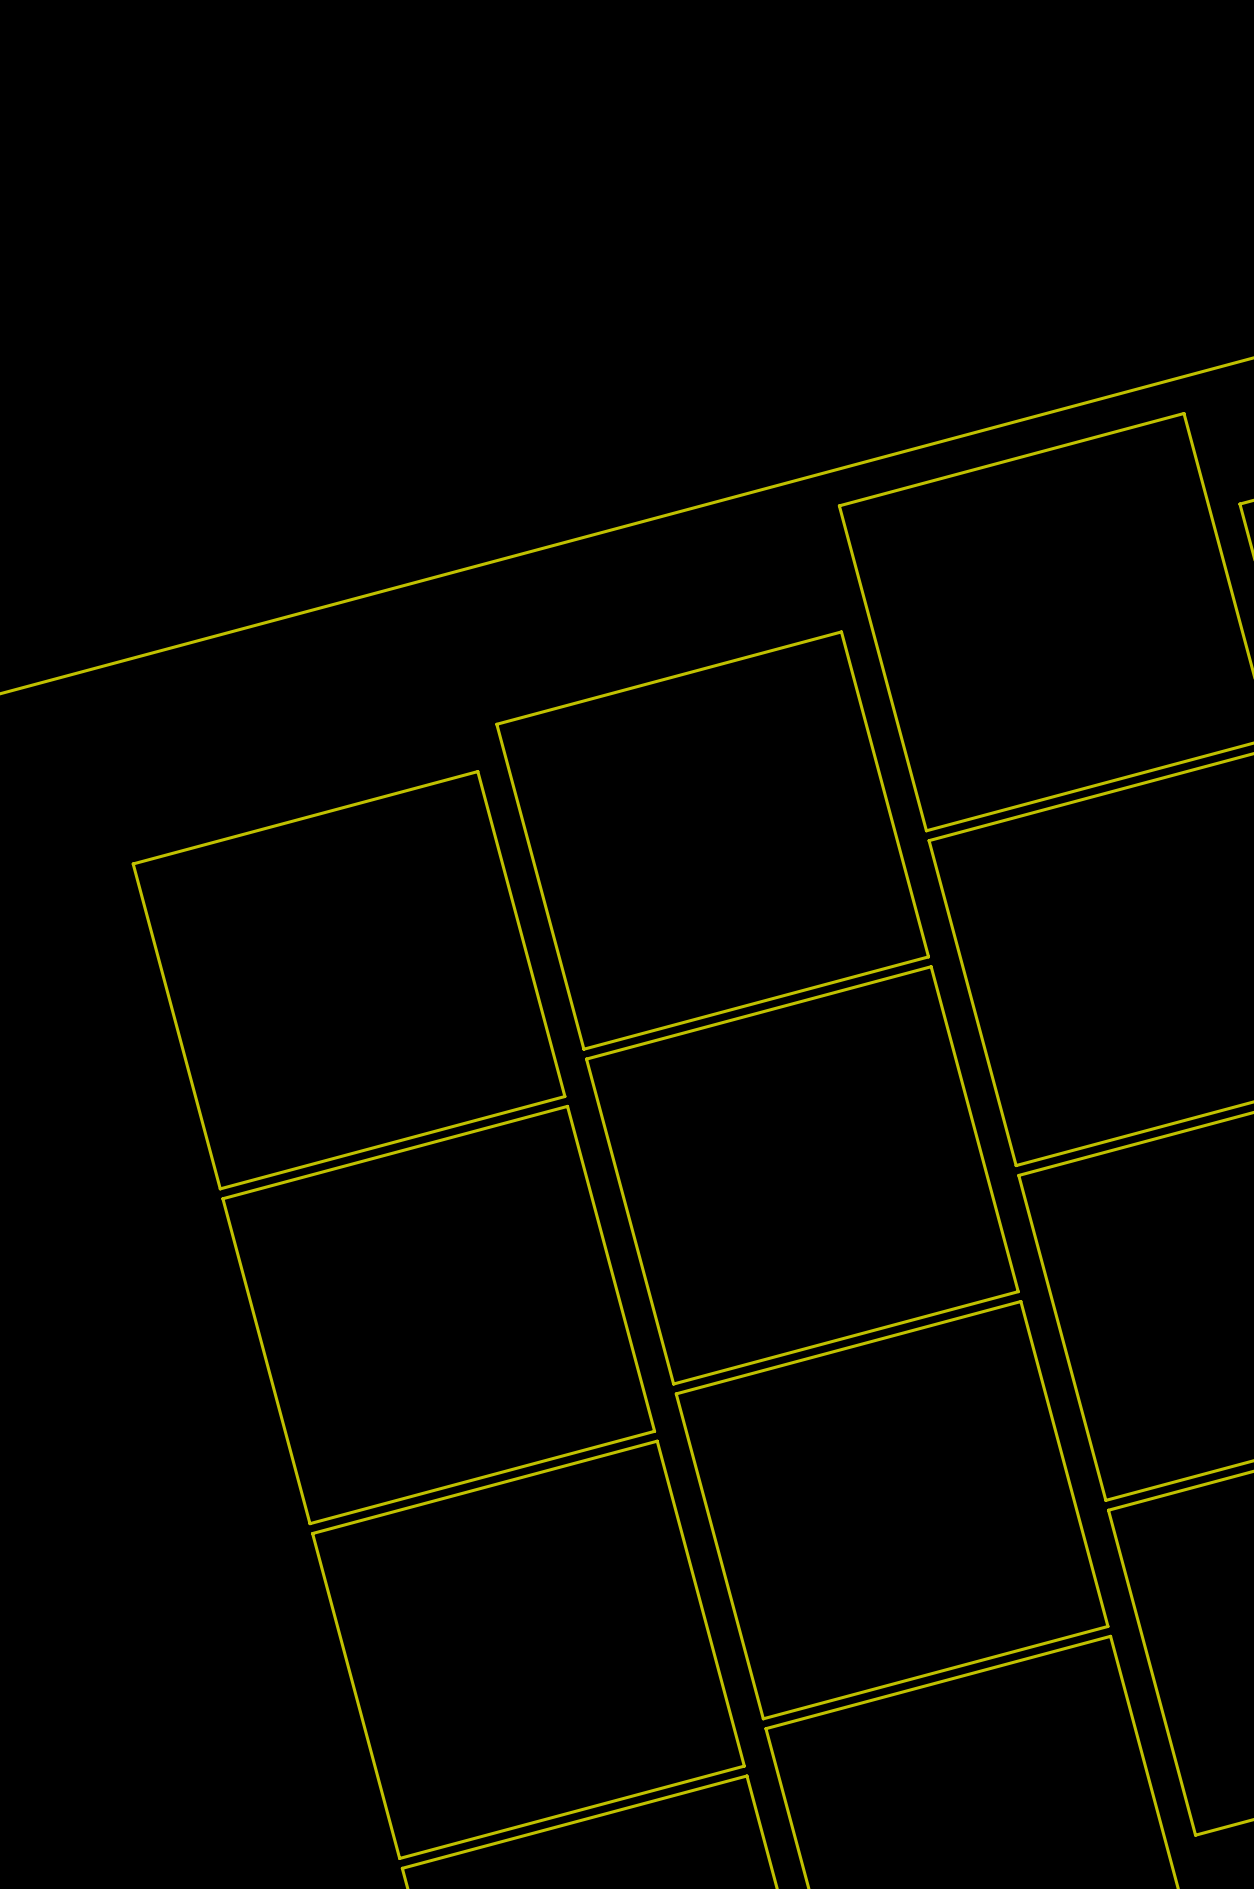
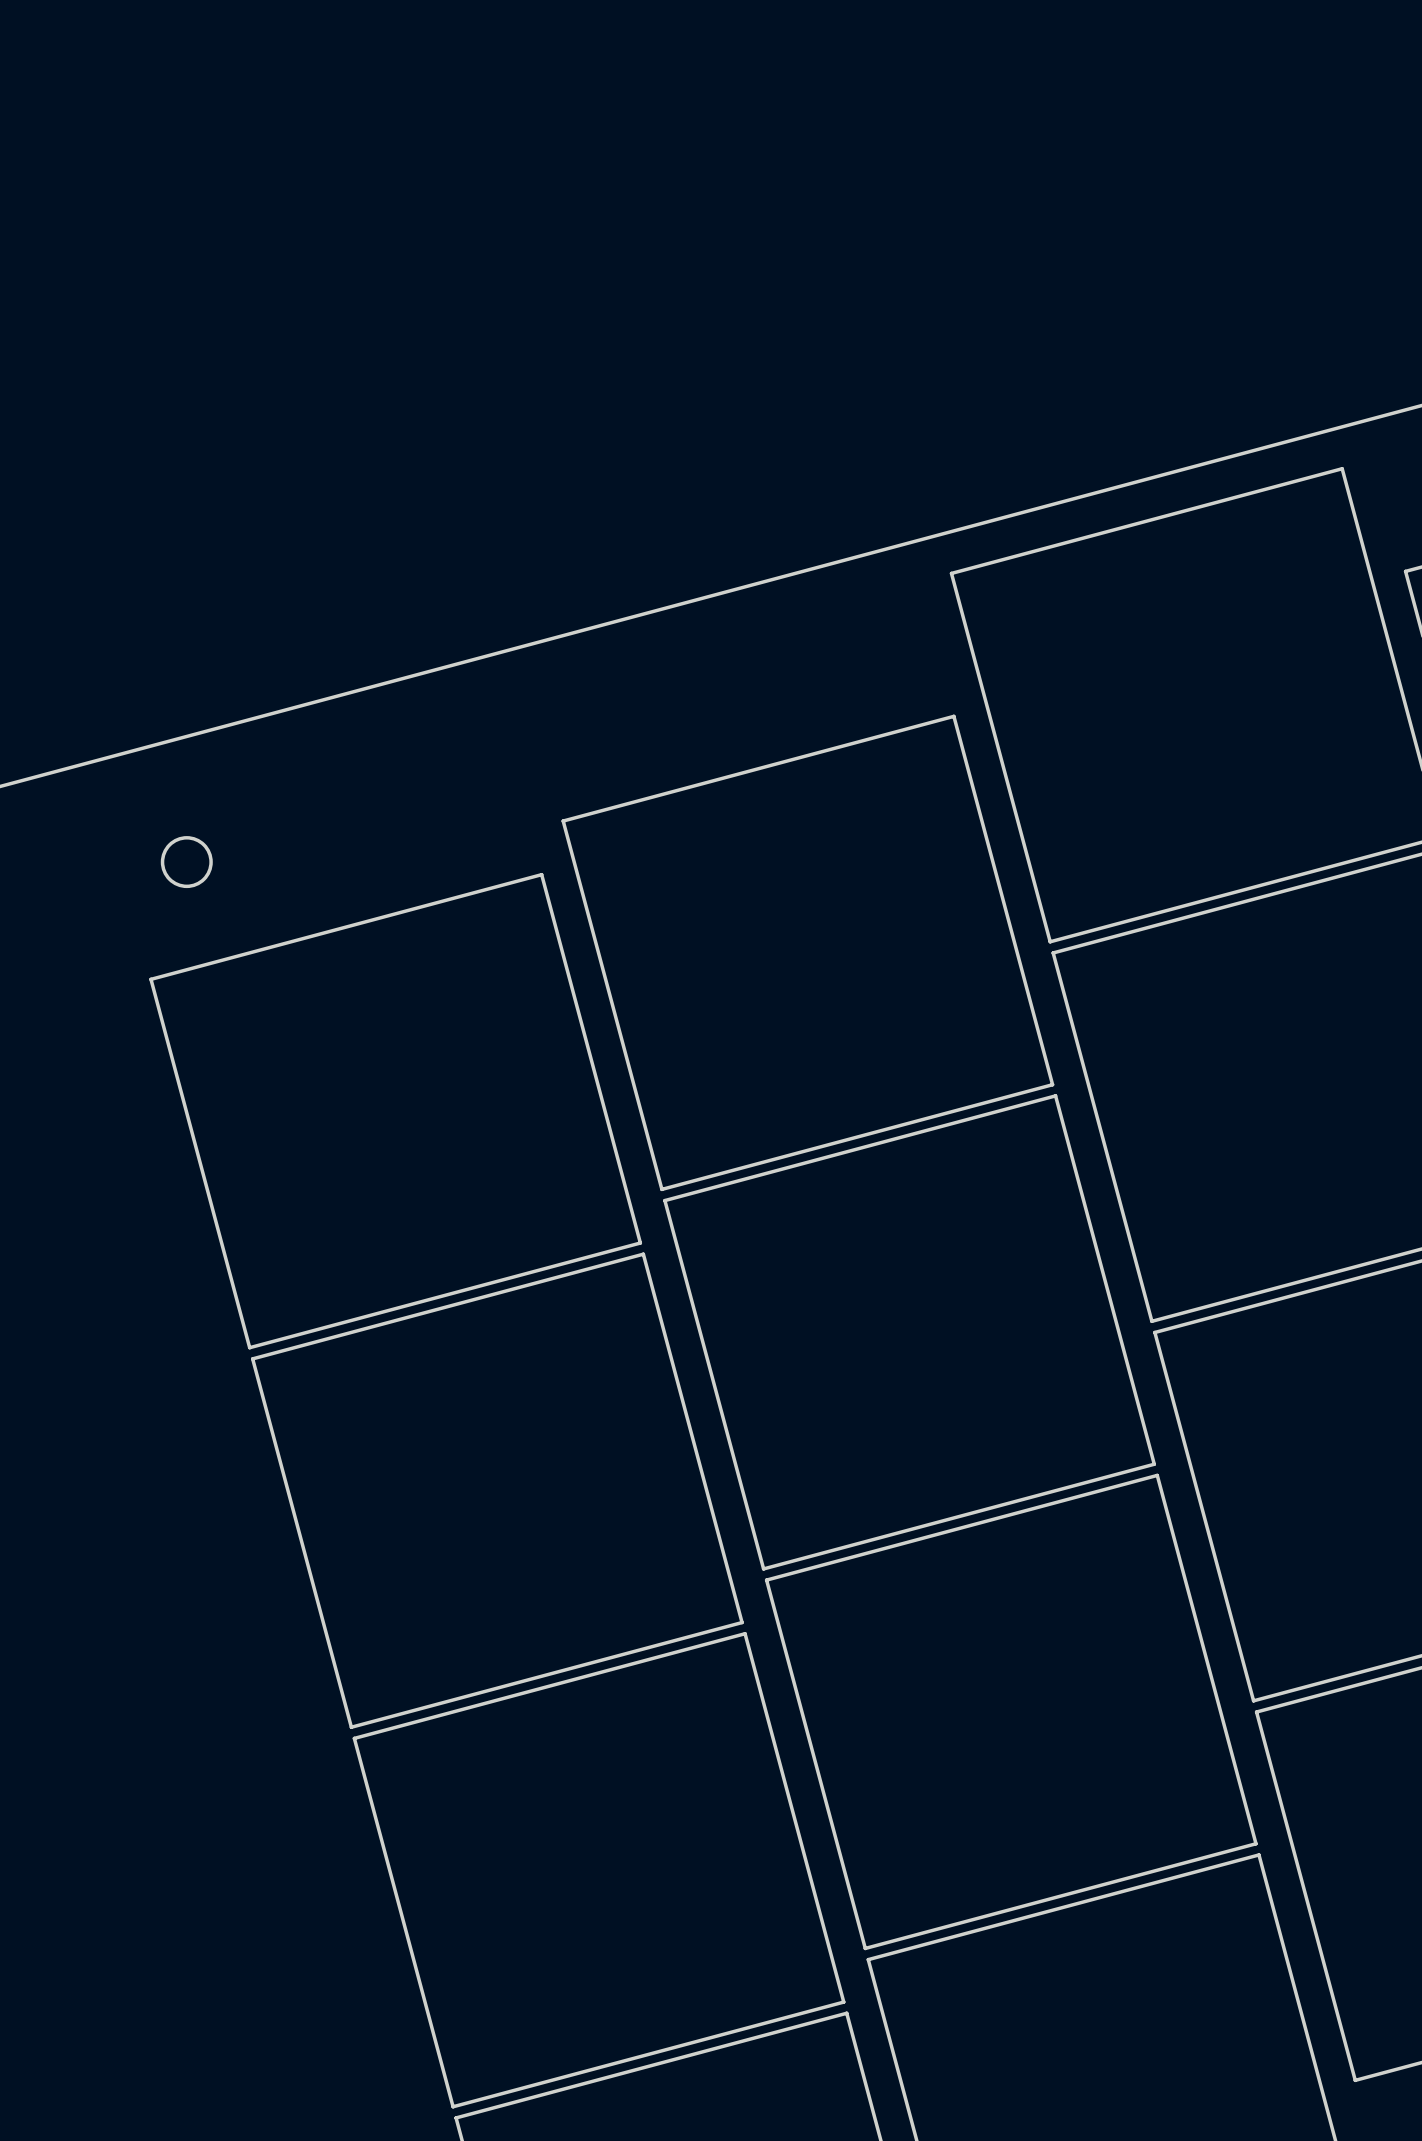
round board edge: none -> [160, 836, 213, 889]

